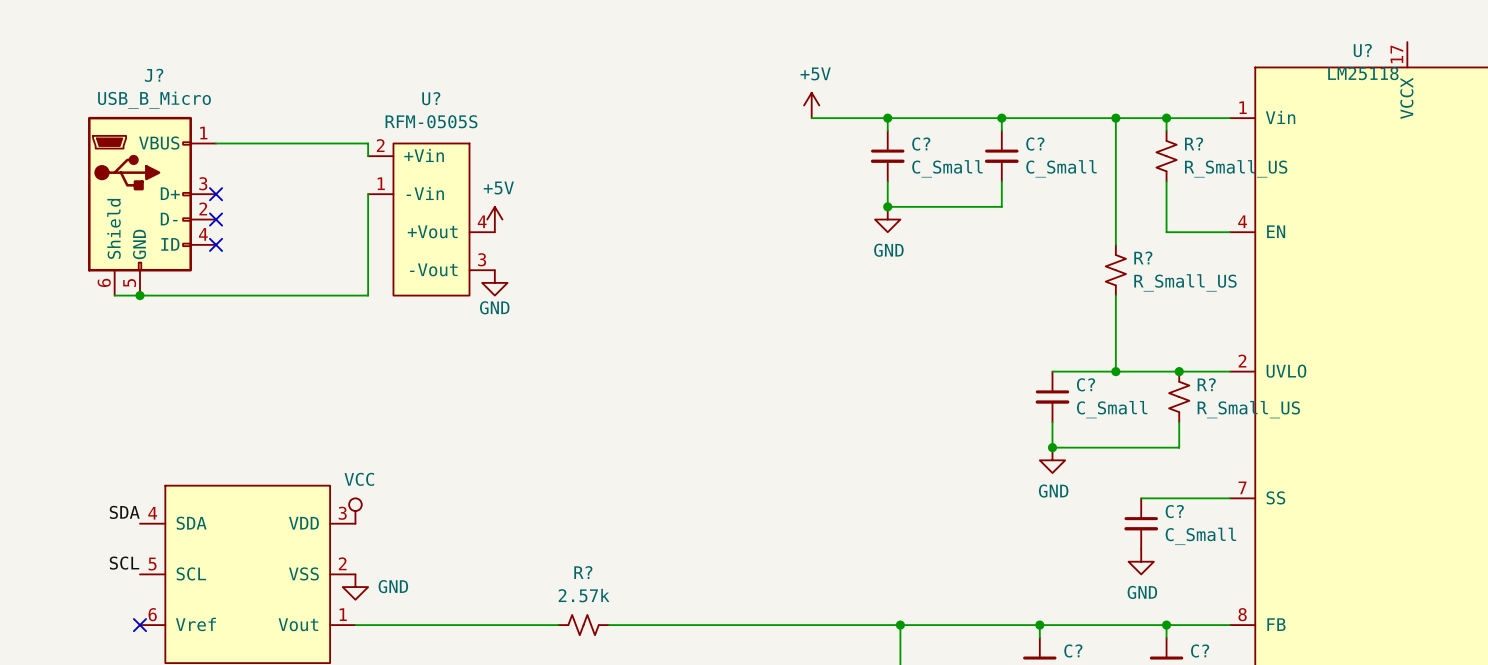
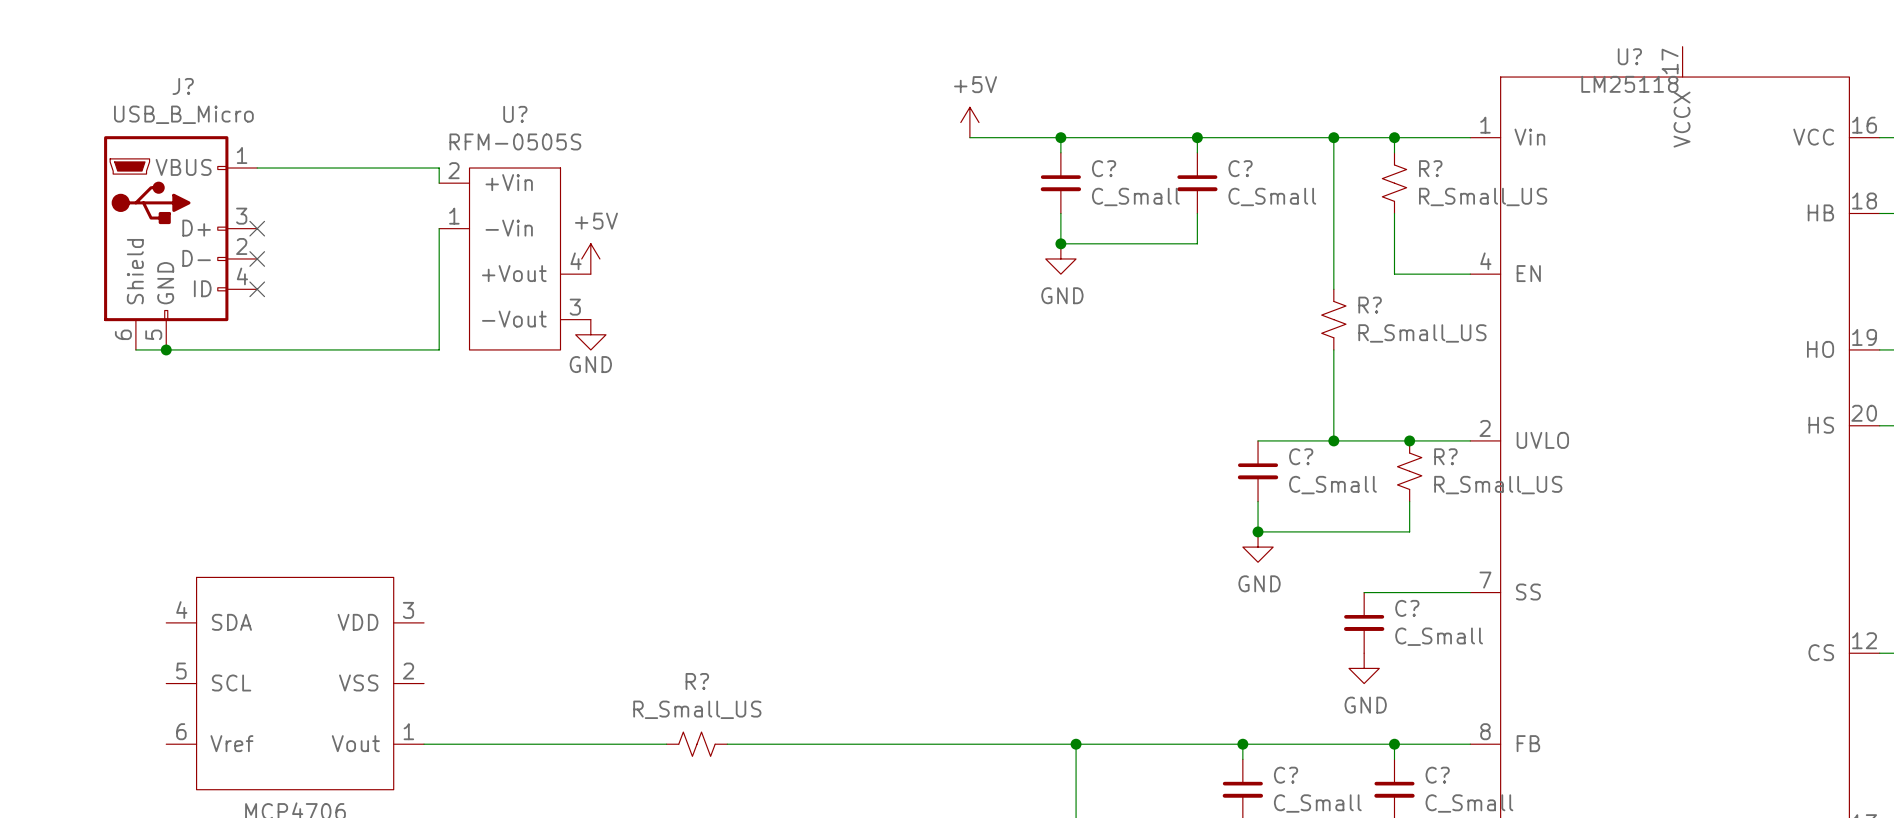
power symbol: VCC (355, 511) -> none
label: SDA (124, 512) -> none
label: SCL (124, 563) -> none
power symbol: GND (355, 587) -> none
R? value: 2.57k (584, 595) -> R_Small_US (697, 709)
no-connect mark: (139, 625) -> none

